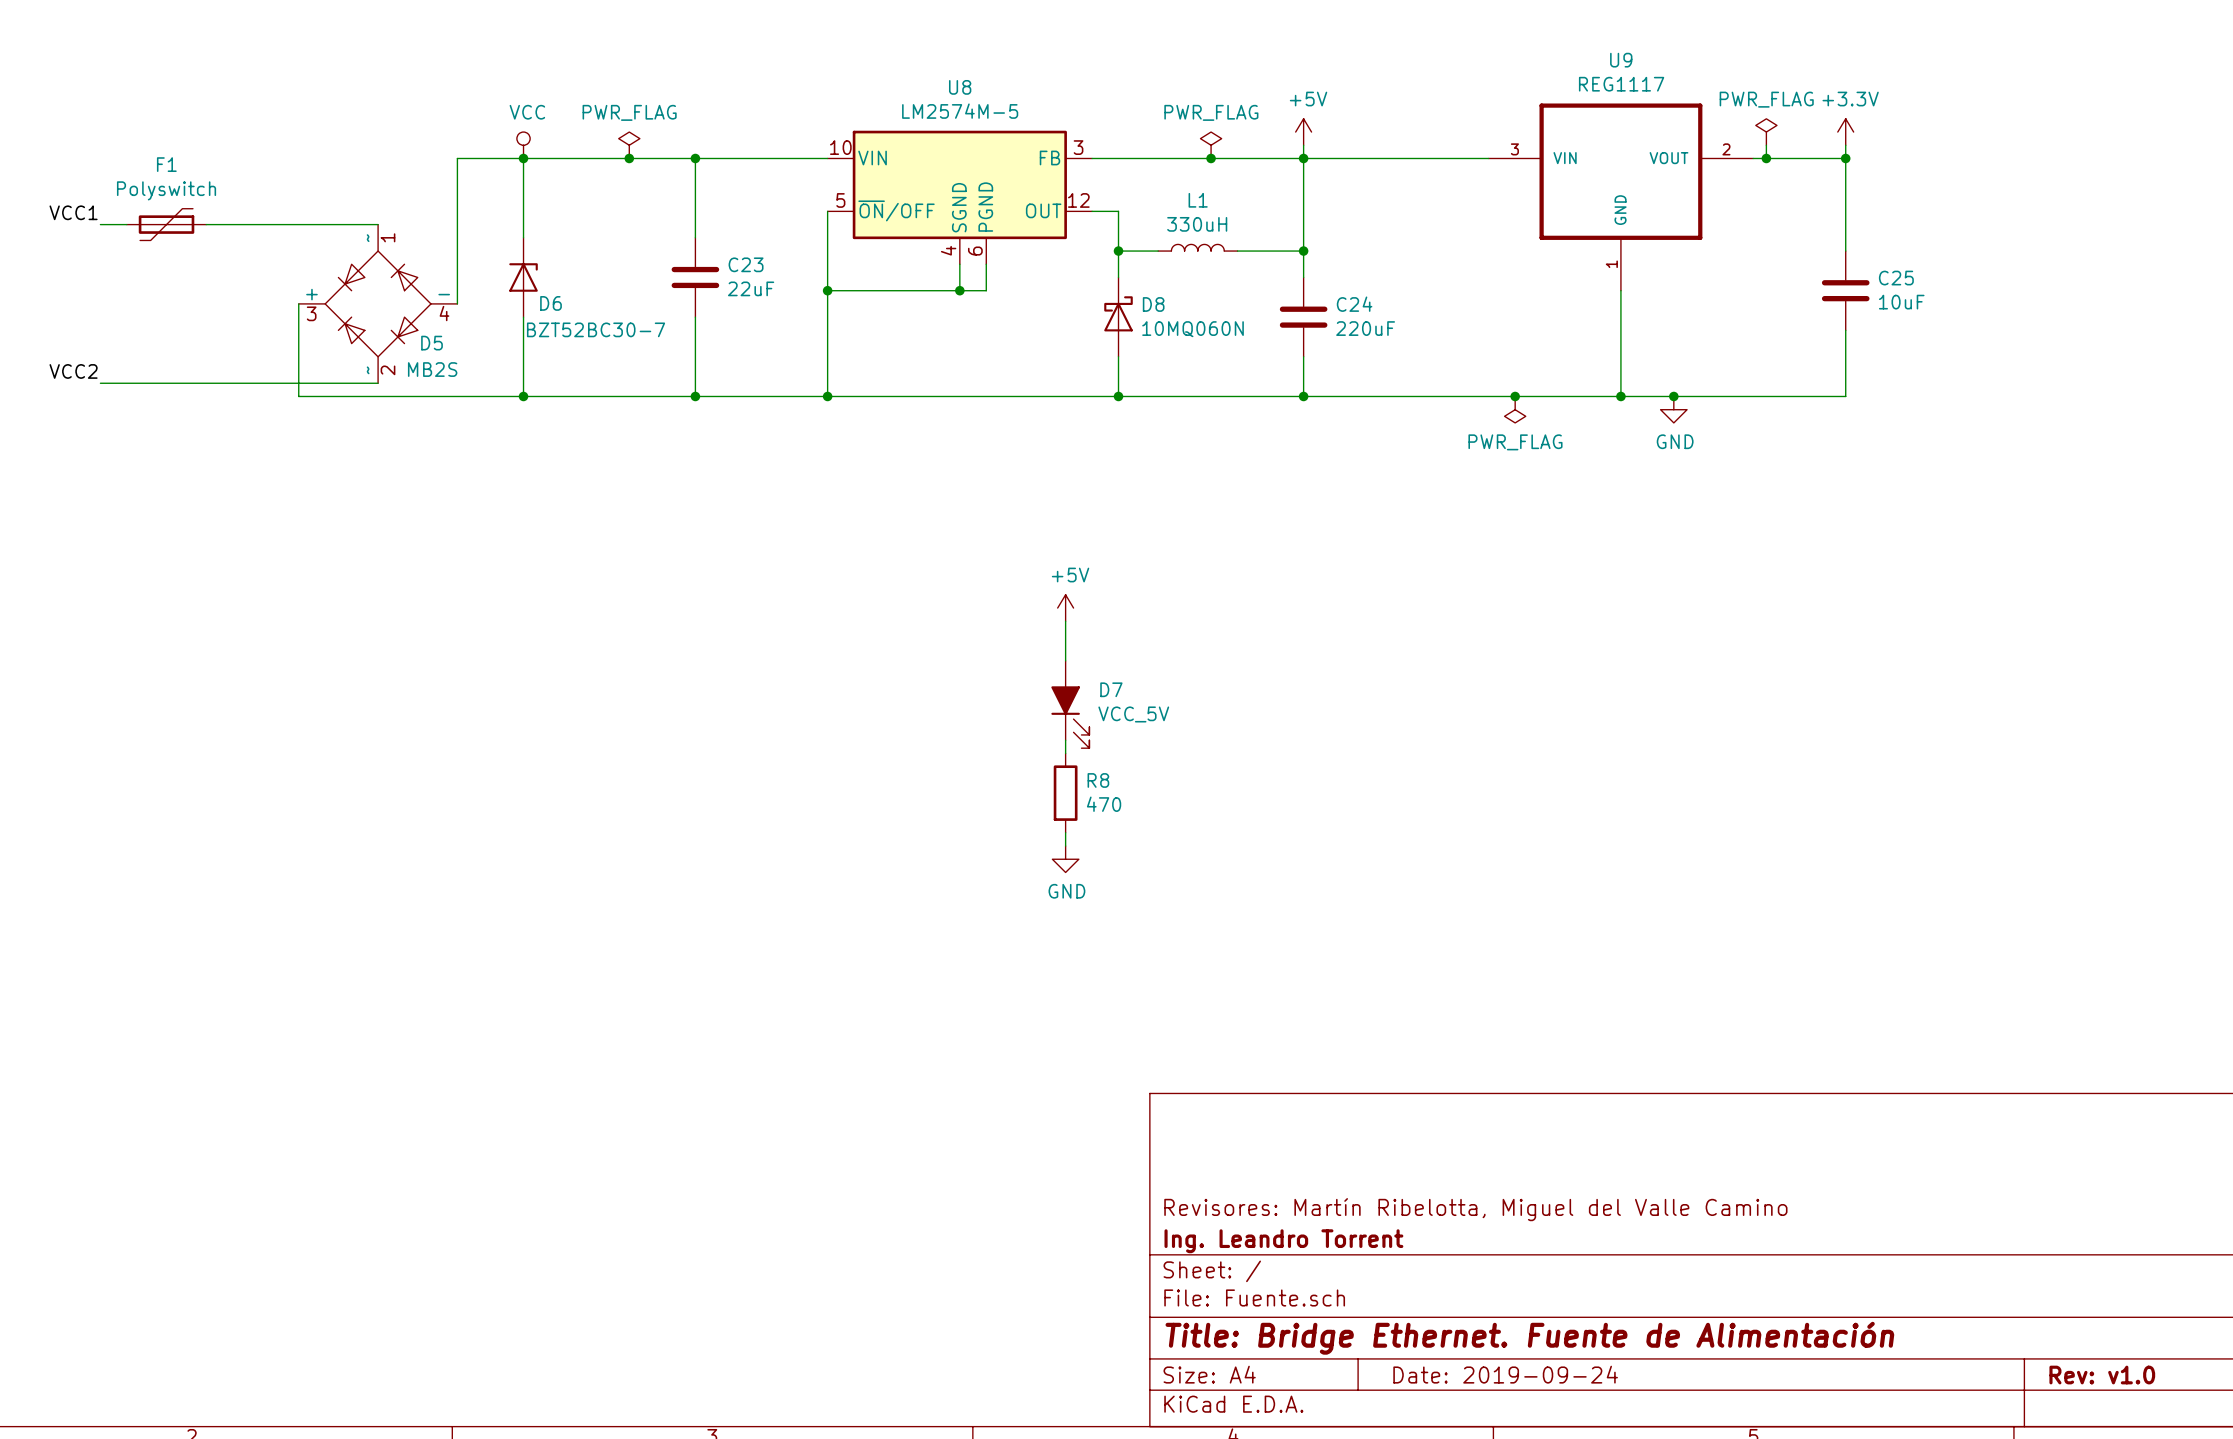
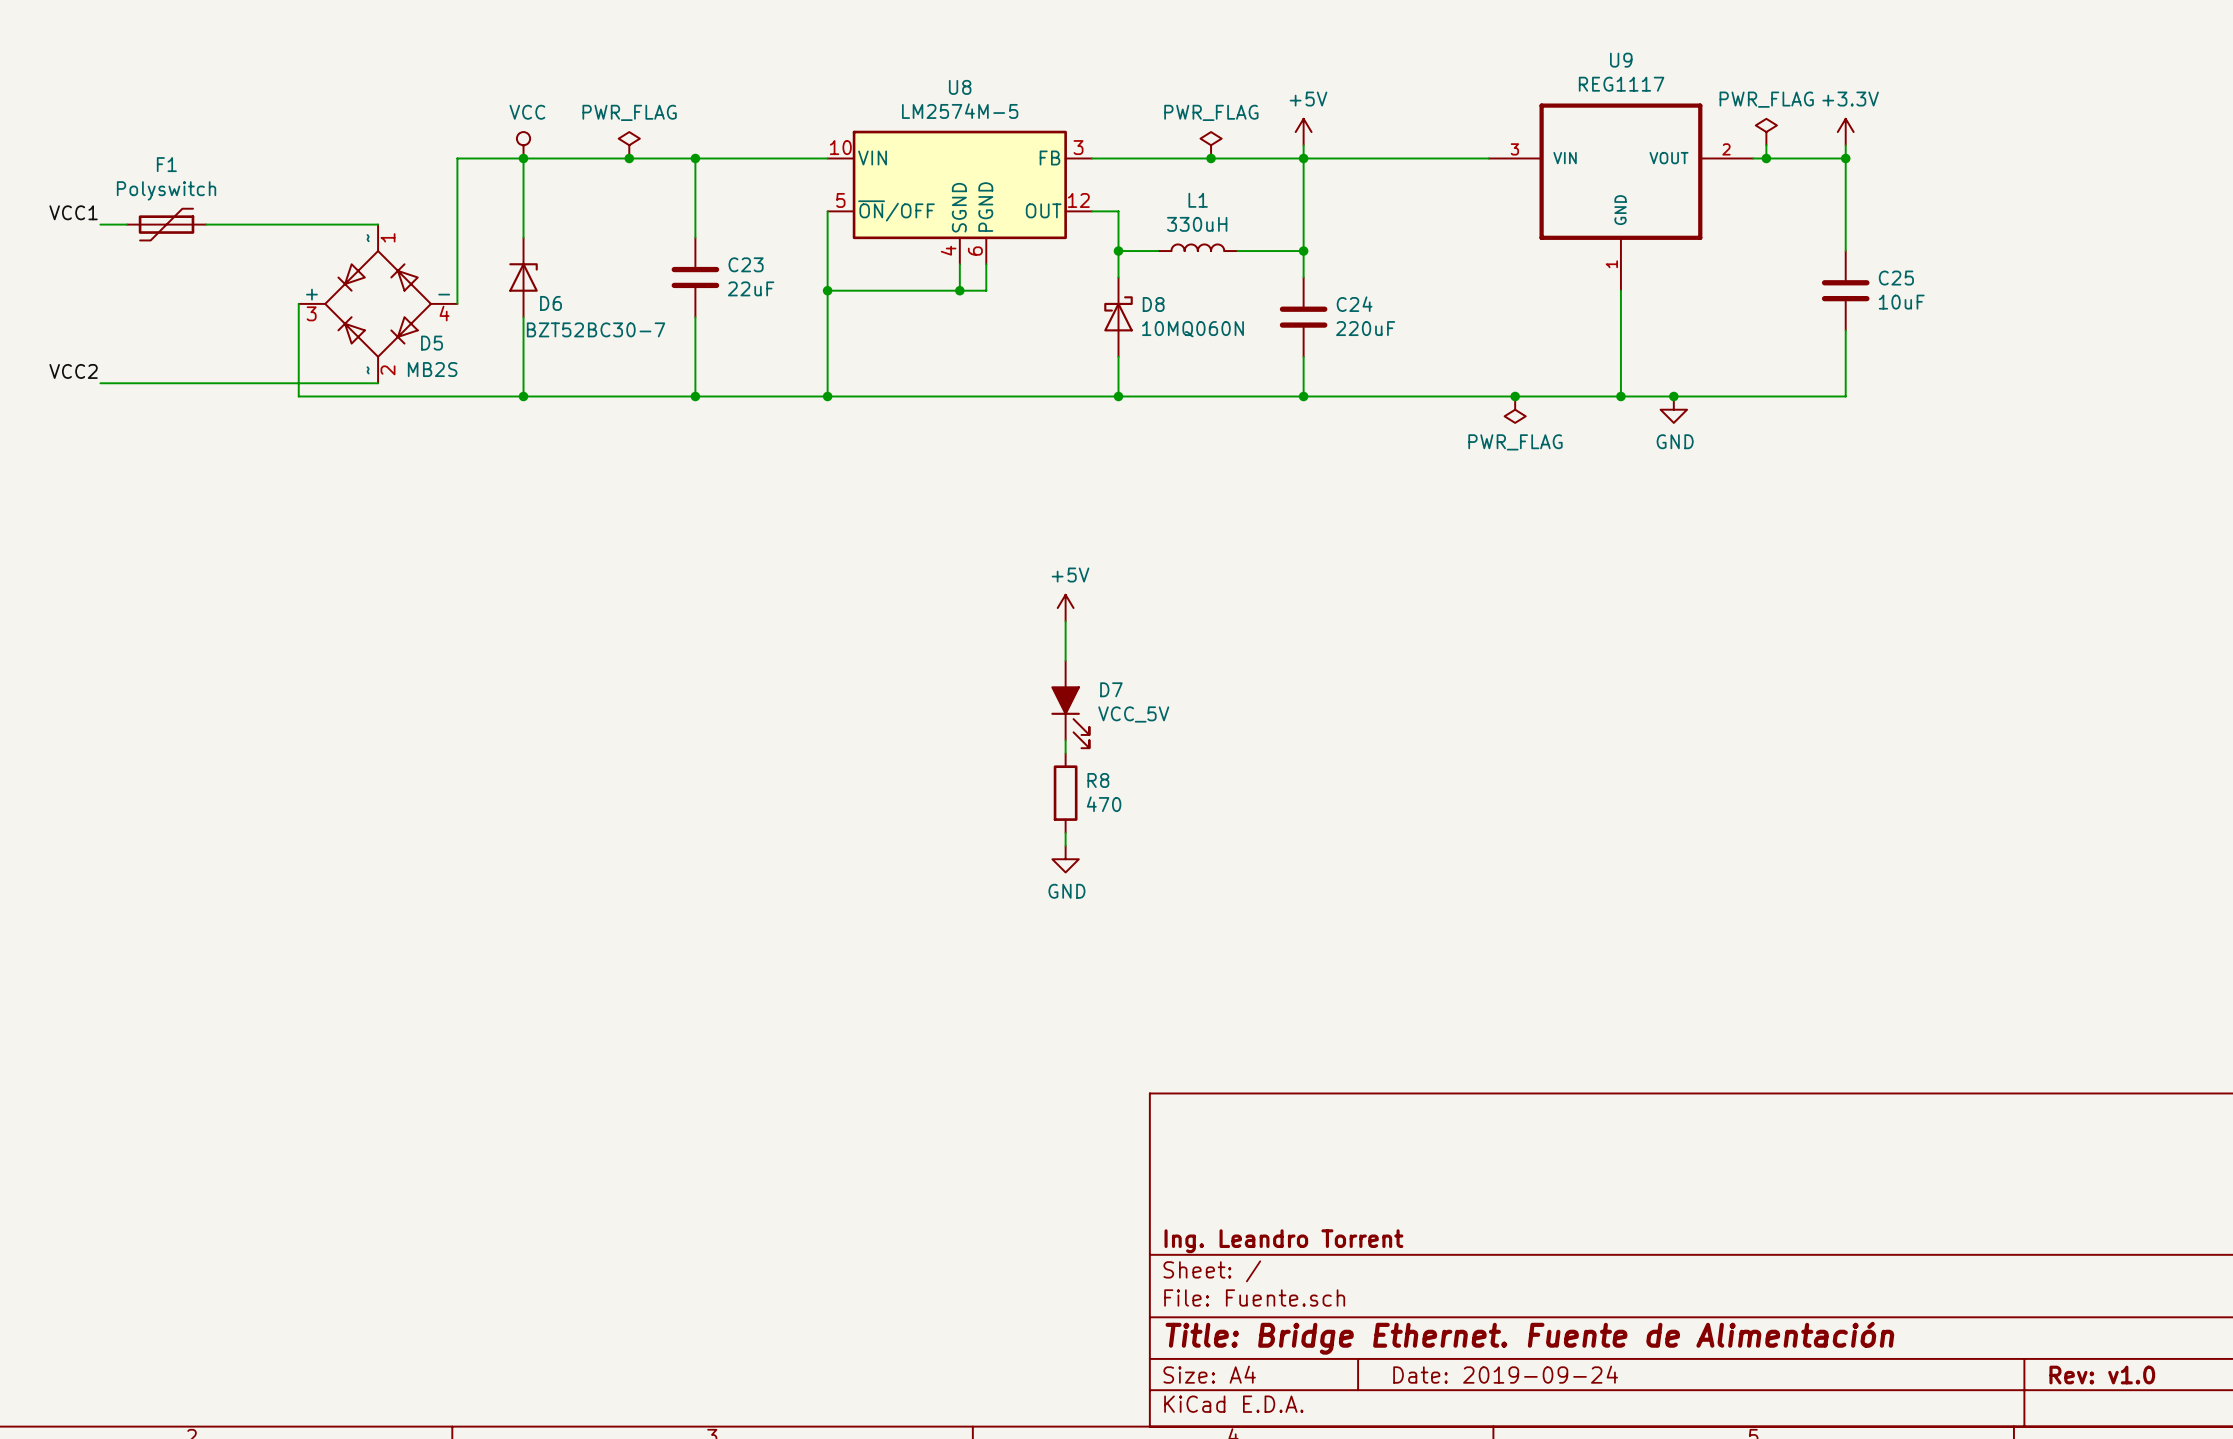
title block: Revisores: Martín Ribelotta, Miguel del Valle Camino (1475, 1209) -> none

